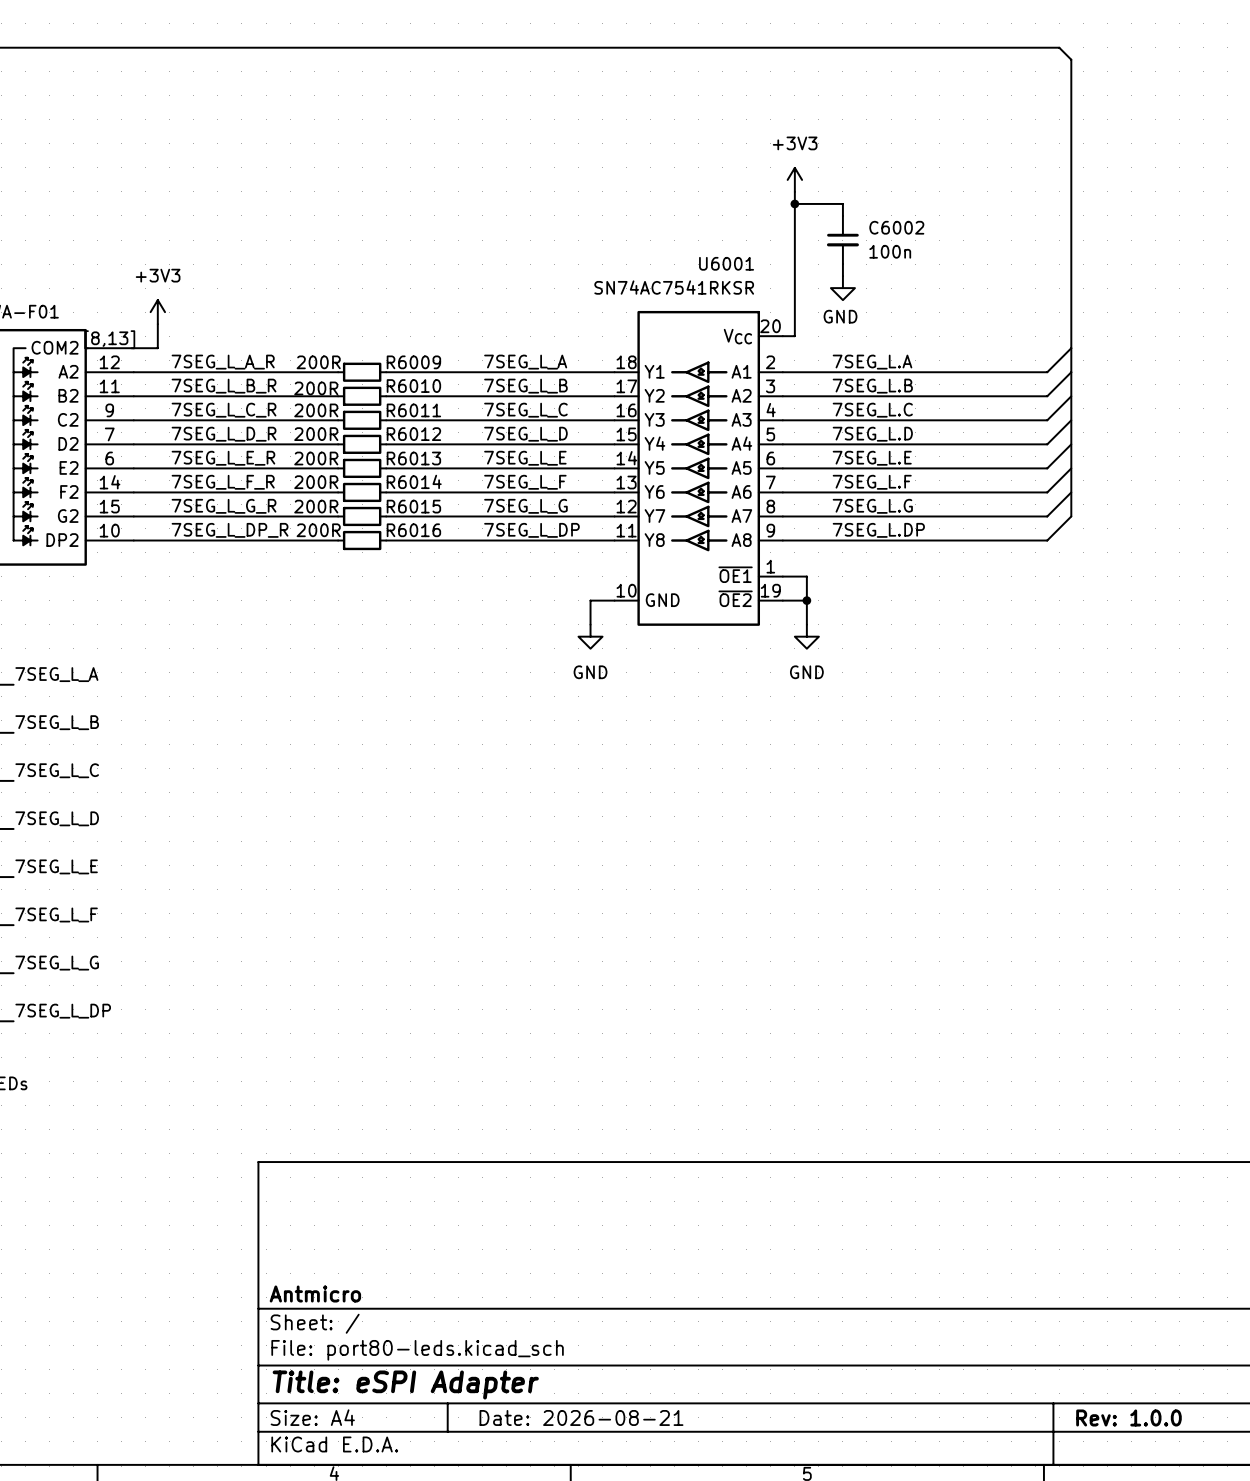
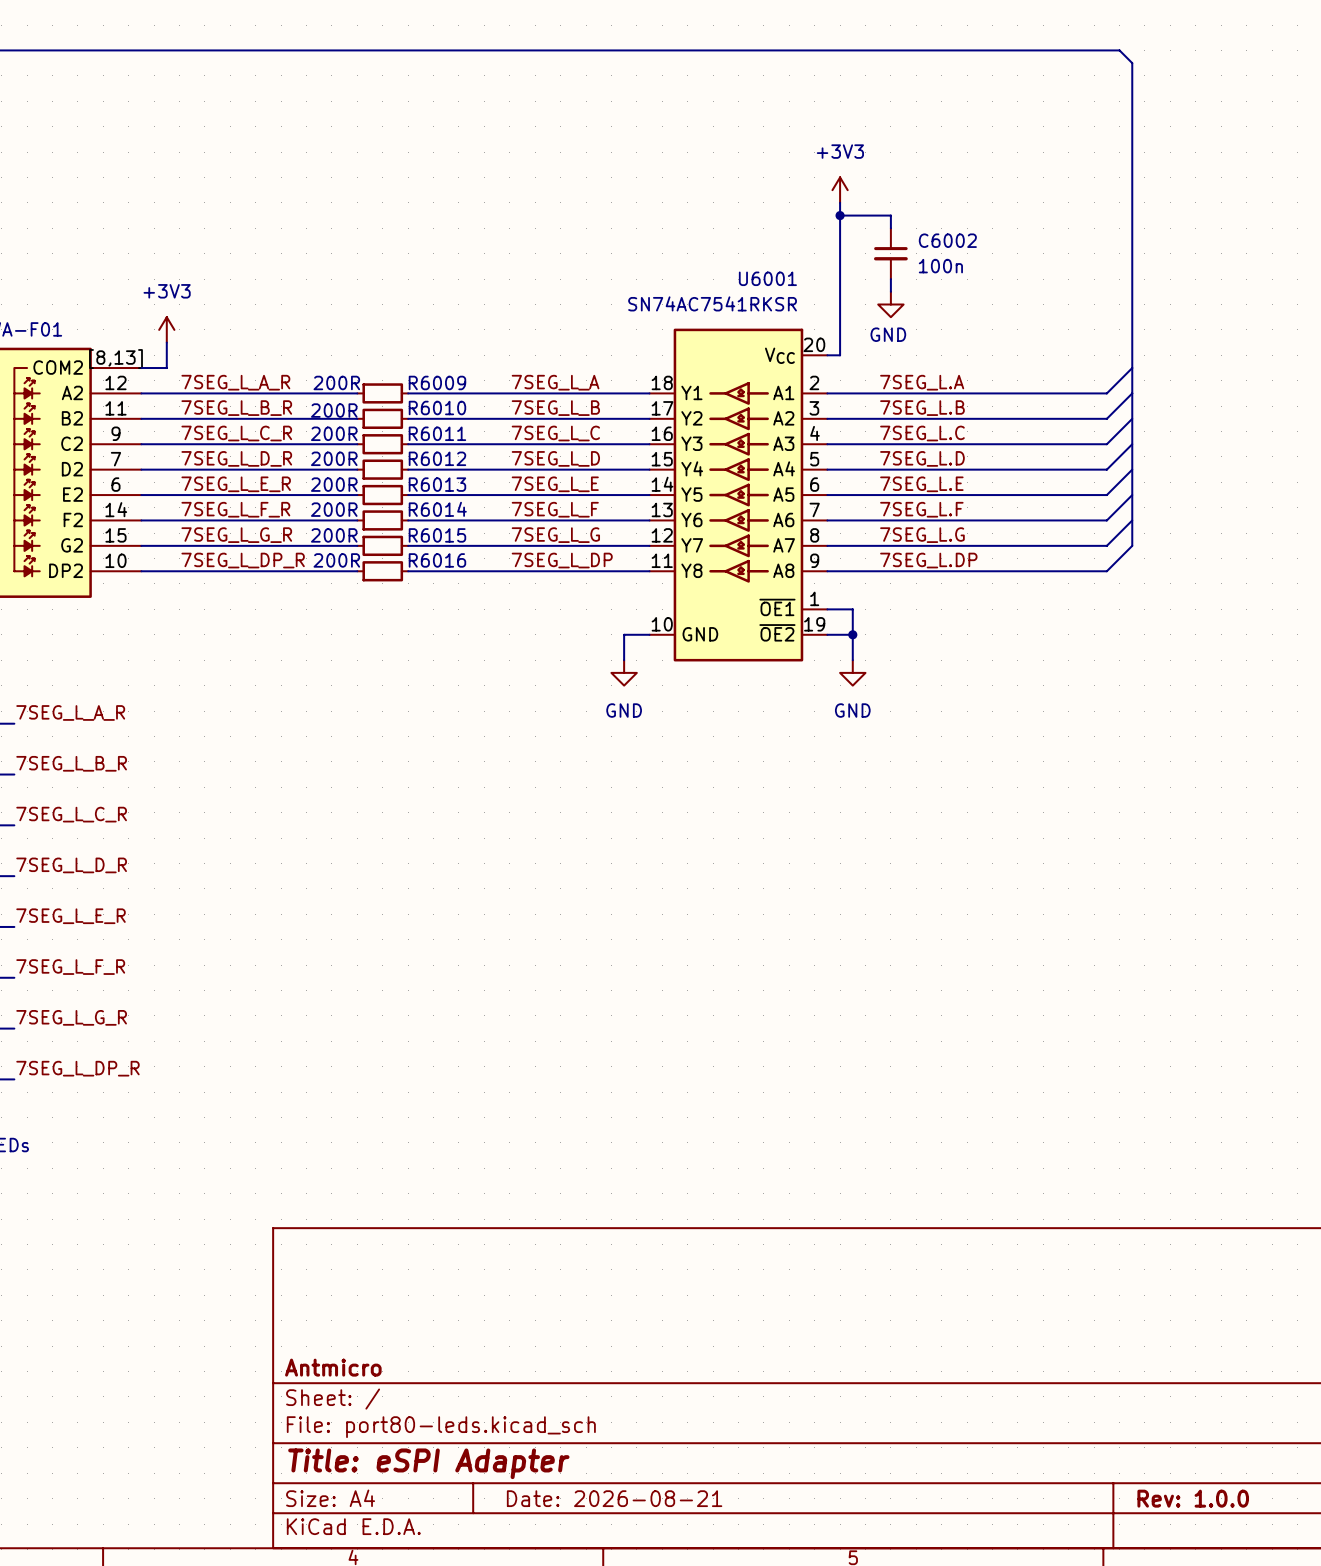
label: 7SEG_L_A (56, 674) -> 7SEG_L_A_R (70, 712)
label: 7SEG_L_B (57, 722) -> 7SEG_L_B_R (71, 763)
label: 7SEG_L_C (57, 770) -> 7SEG_L_C_R (71, 814)
label: 7SEG_L_D (57, 818) -> 7SEG_L_D_R (71, 865)
label: 7SEG_L_E (56, 866) -> 7SEG_L_E_R (71, 916)
label: 7SEG_L_F (56, 914) -> 7SEG_L_F_R (70, 967)
label: 7SEG_L_G (57, 963) -> 7SEG_L_G_R (71, 1017)
label: 7SEG_L_DP (63, 1011) -> 7SEG_L_DP_R (77, 1068)

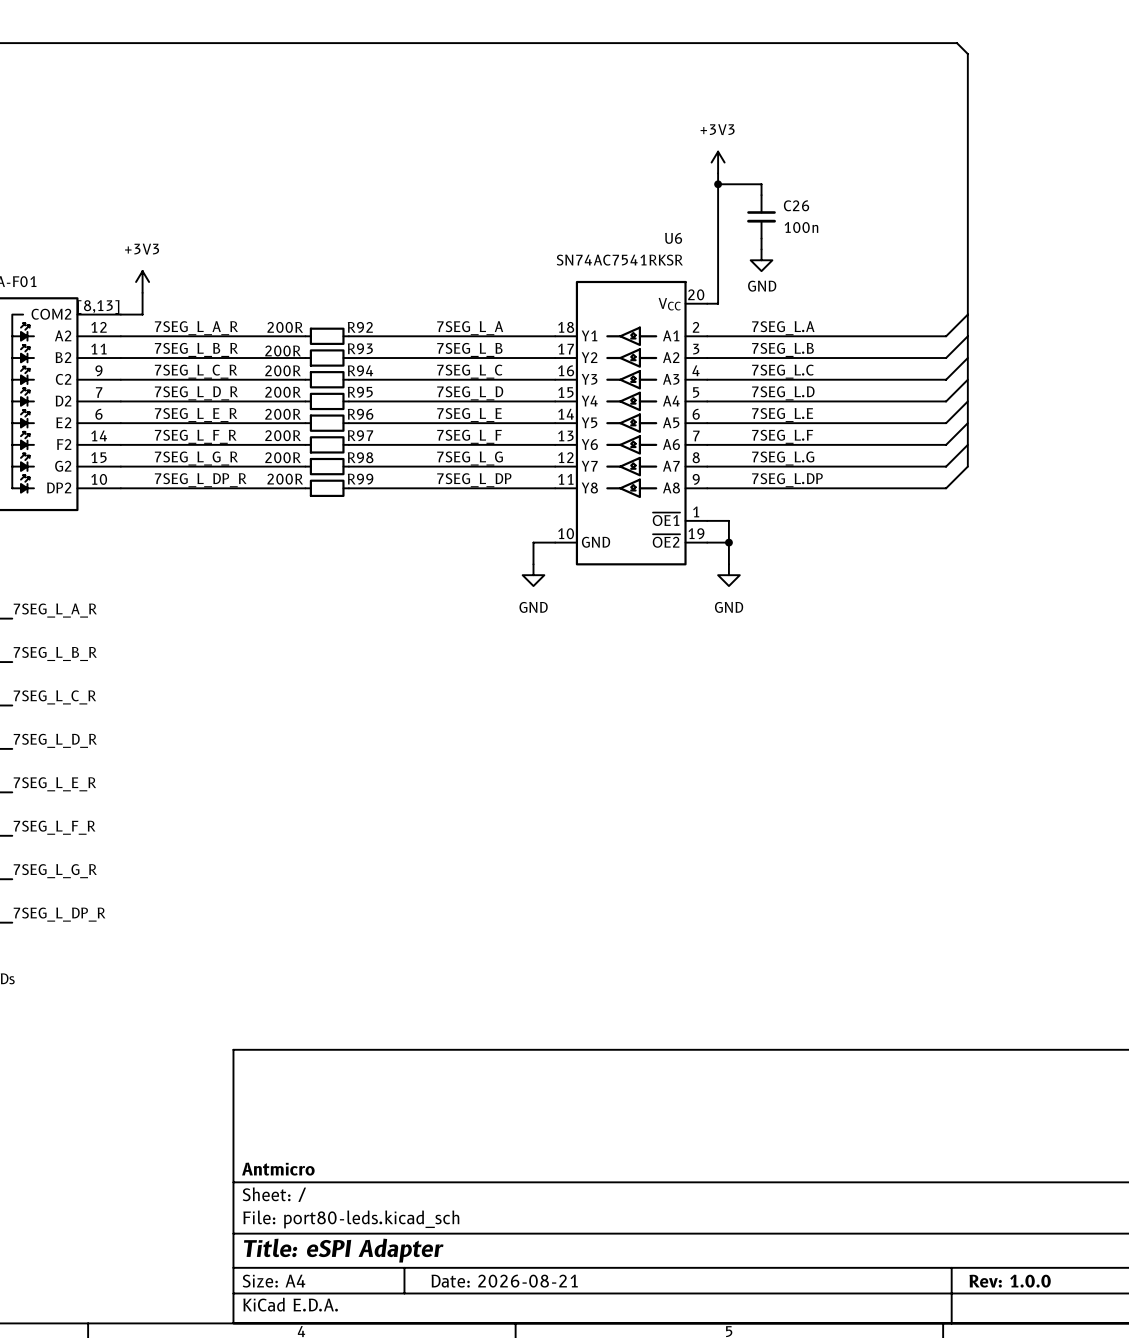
C6002 name: C6002 (947, 240) -> C26 (796, 205)
U6001 name: U6001 (767, 278) -> U6 (673, 238)
R6009 name: R6009 (437, 382) -> R92 (360, 327)
R6010 name: R6010 (437, 408) -> R93 (360, 348)
R6011 name: R6011 (437, 433) -> R94 (360, 370)
R6012 name: R6012 (437, 458) -> R95 (360, 392)
R6013 name: R6013 (437, 484) -> R96 (360, 414)
R6014 name: R6014 (437, 509) -> R97 (360, 435)
R6015 name: R6015 (437, 535) -> R98 (360, 457)
R6016 name: R6016 (437, 560) -> R99 (360, 479)

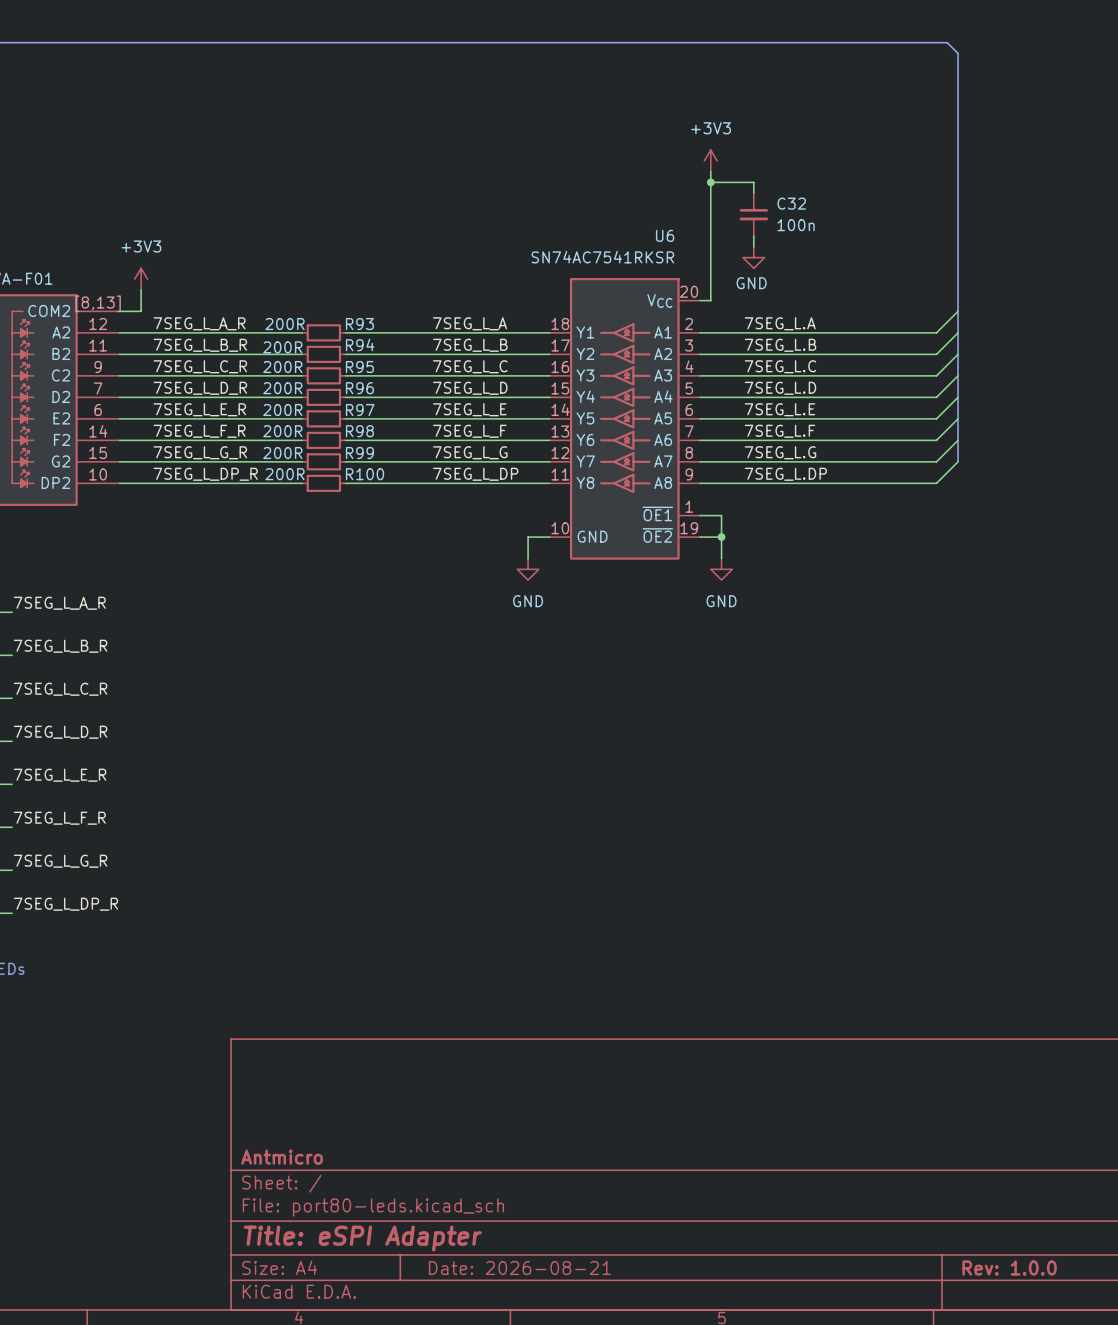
C26 name: C26 (796, 205) -> C32 (791, 203)
R92 name: R92 (360, 327) -> R93 (359, 324)
R93 name: R93 (360, 348) -> R94 (360, 344)
R94 name: R94 (360, 370) -> R95 (359, 367)
R95 name: R95 (360, 392) -> R96 (359, 388)
R96 name: R96 (360, 414) -> R97 (360, 410)
R97 name: R97 (360, 435) -> R98 (359, 431)
R98 name: R98 (360, 457) -> R99 (359, 453)
R99 name: R99 (360, 479) -> R100 (365, 474)

